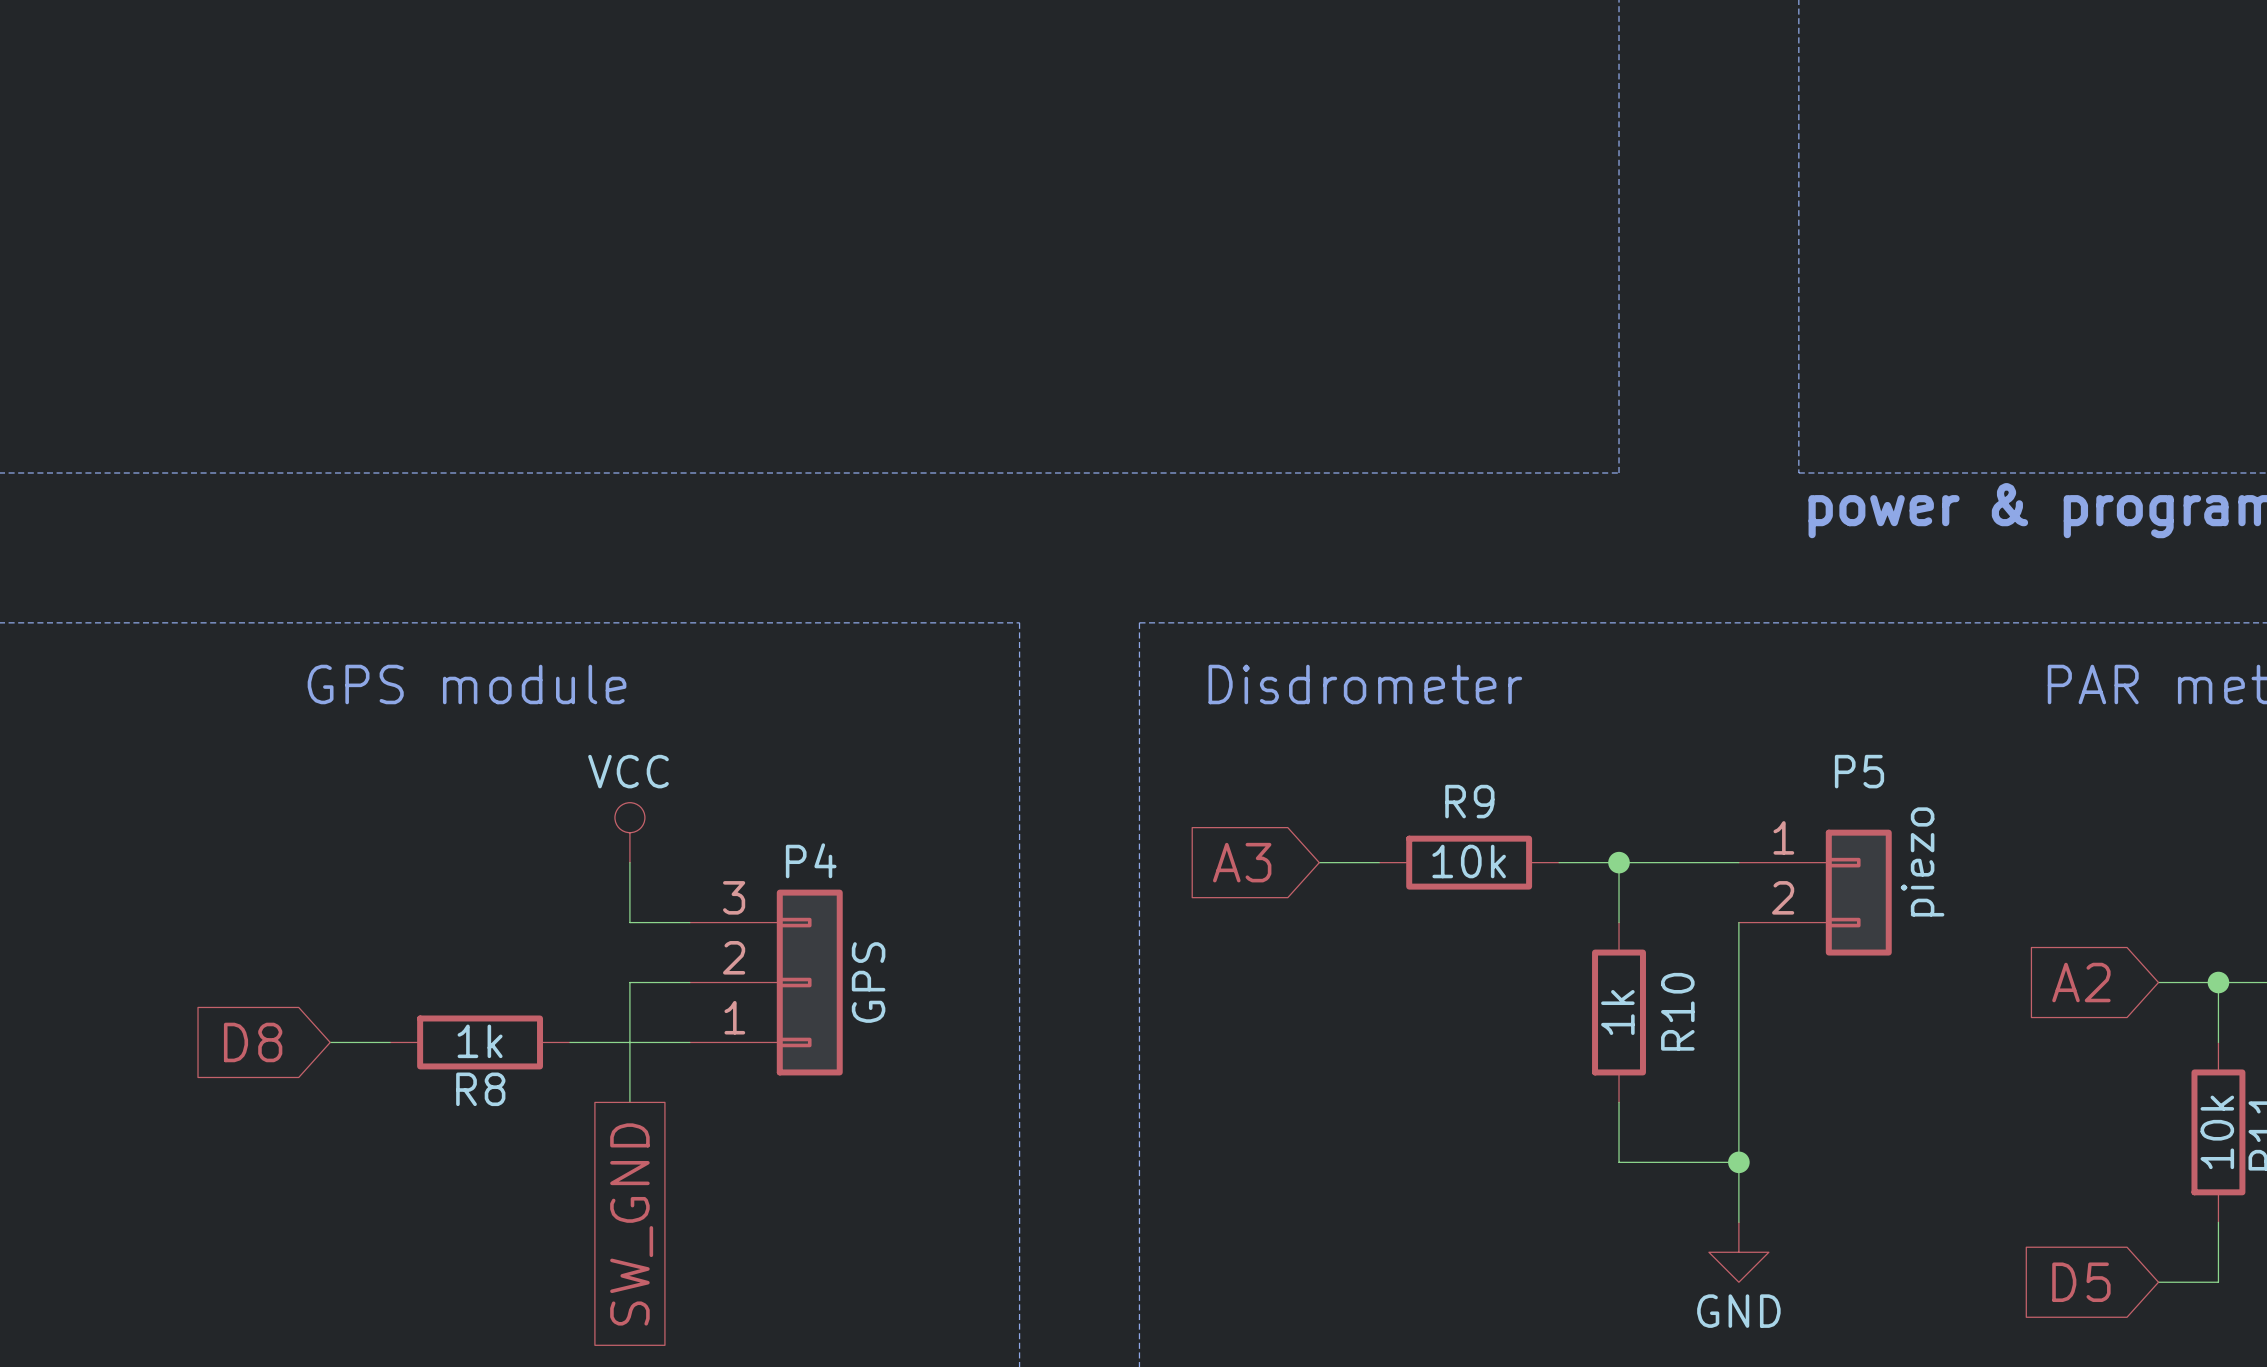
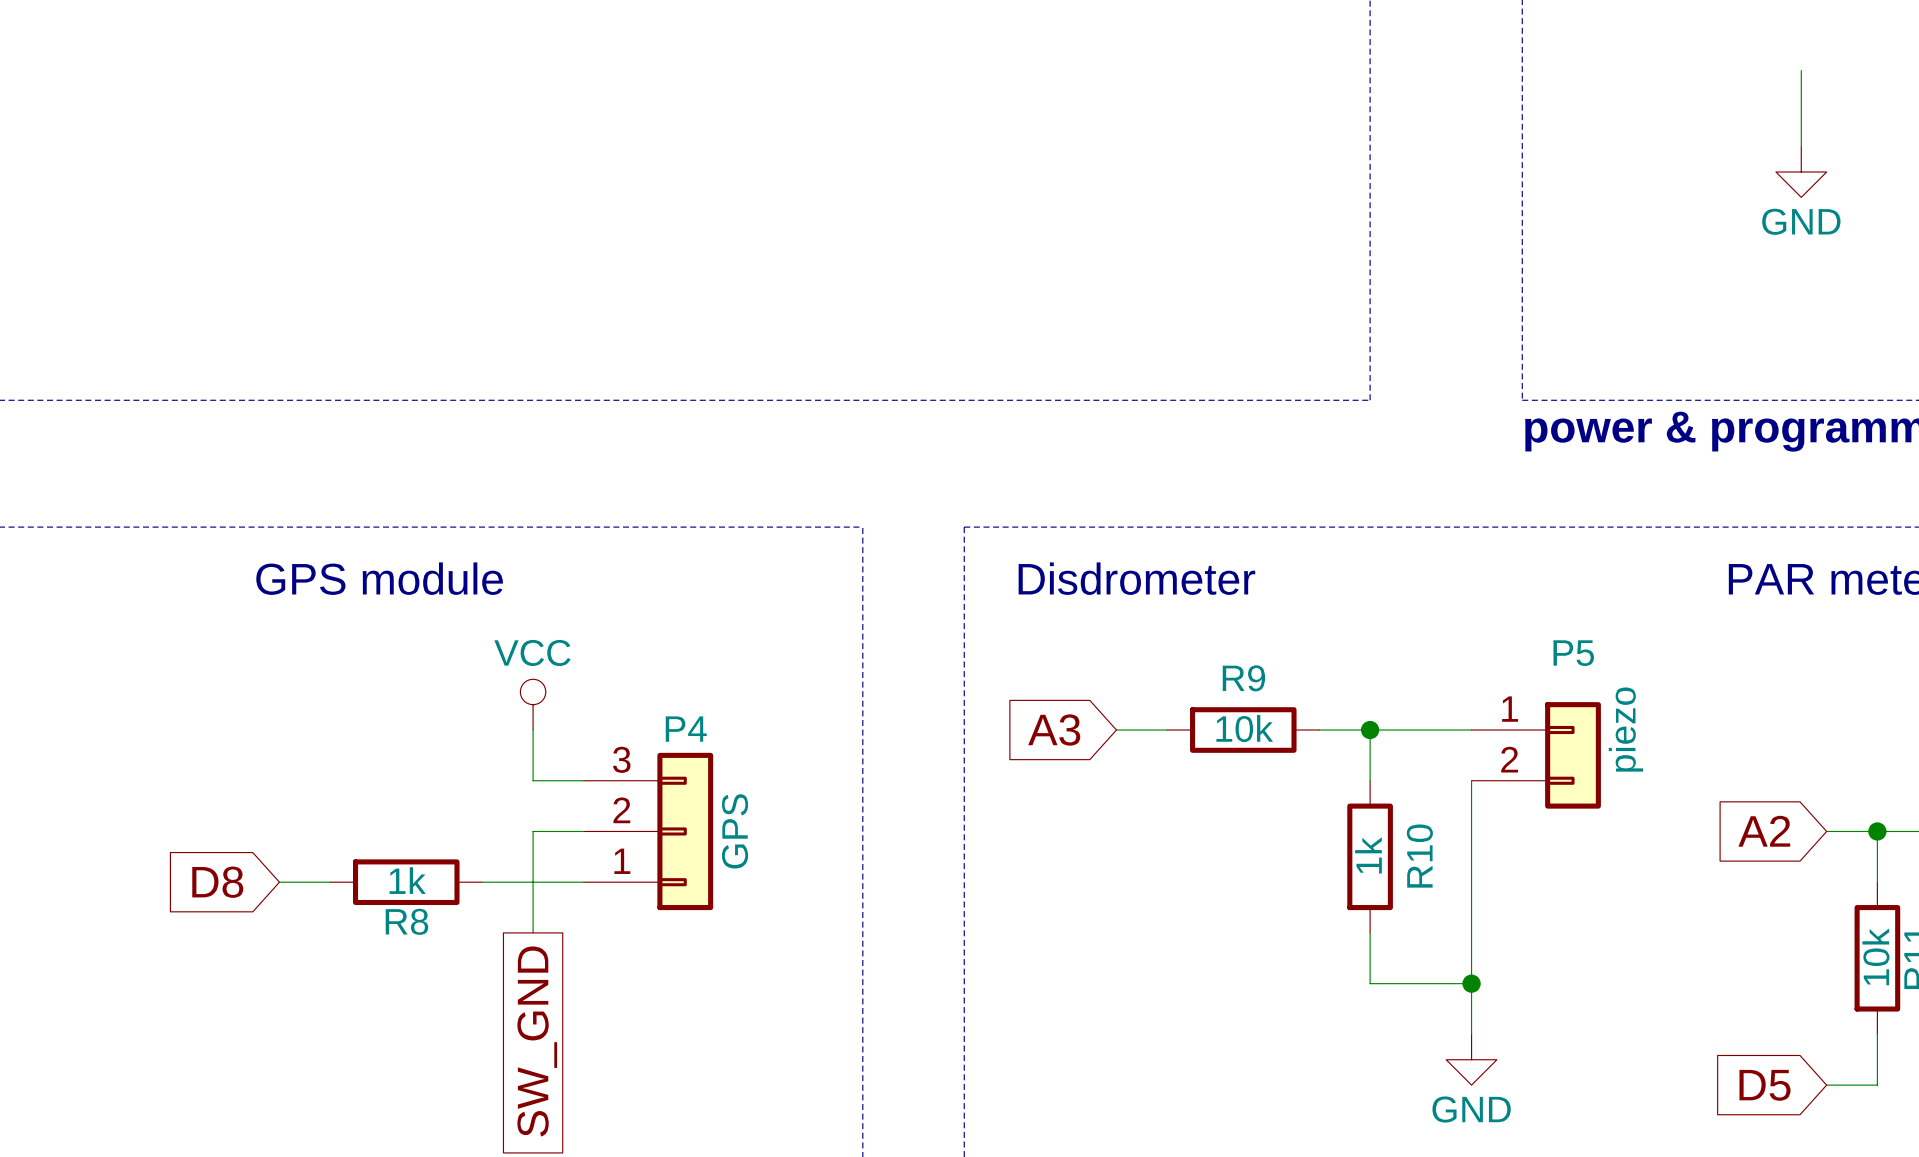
wire: none -> (1801, 70) (1801, 146)
power symbol: none -> GND (1801, 172)

